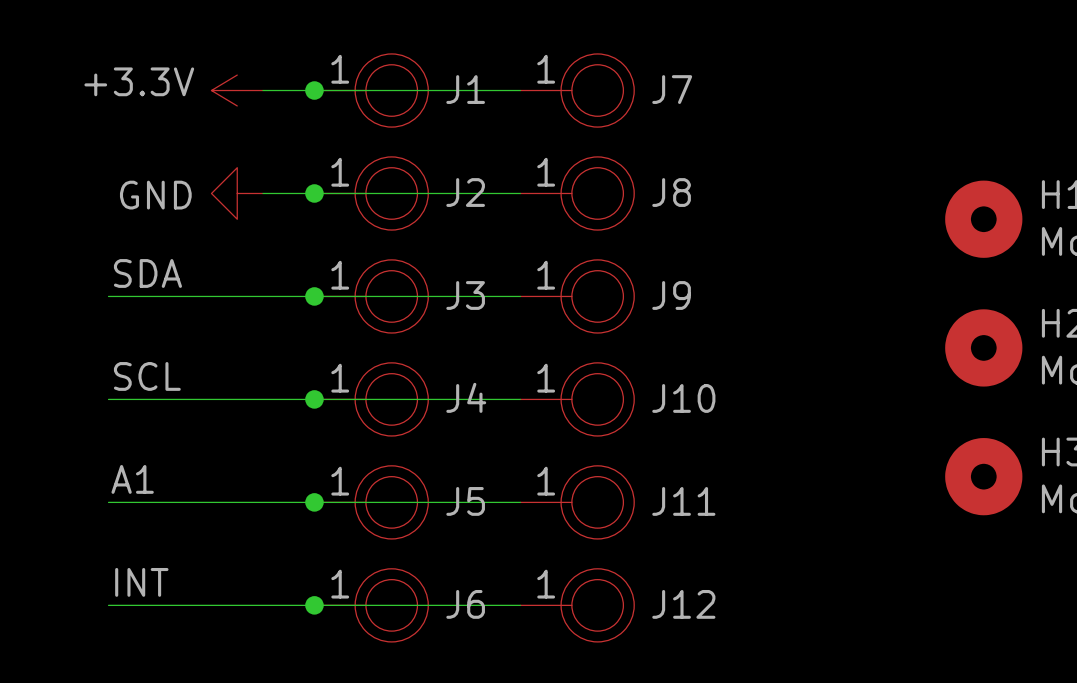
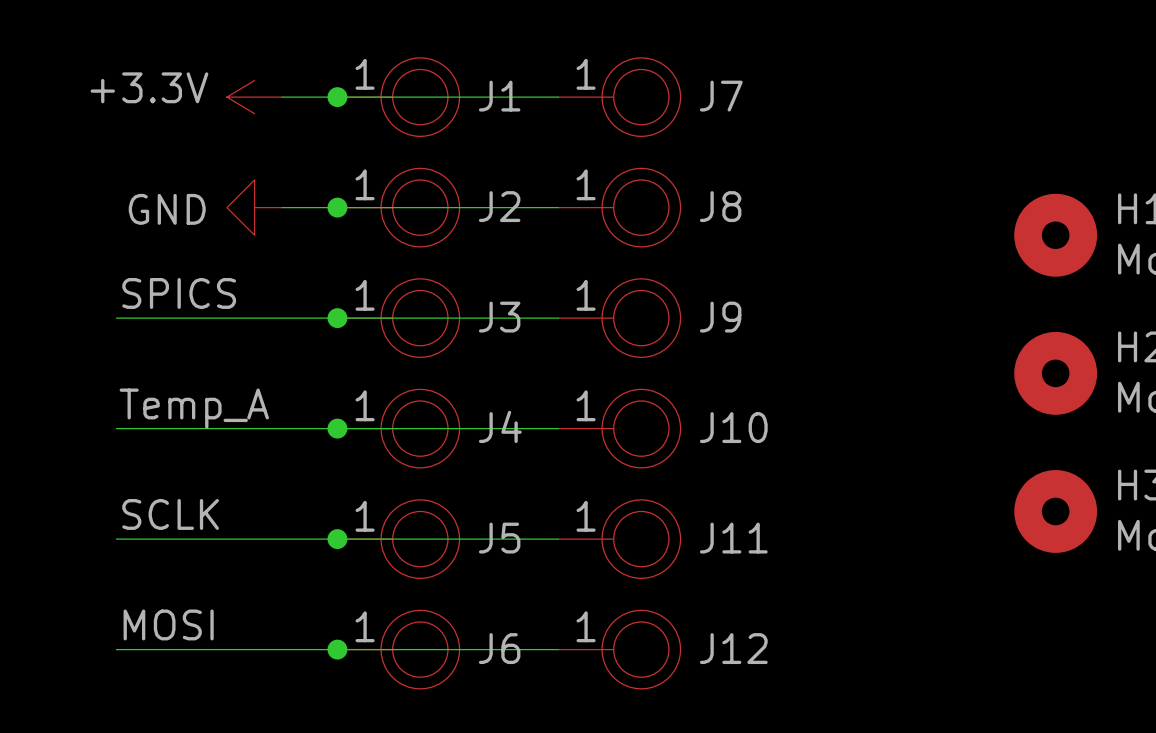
label: SDA (147, 273) -> SPICS (179, 293)
label: SCL (147, 376) -> Temp_A (194, 408)
label: A1 (132, 479) -> SCLK (170, 514)
label: INT (141, 582) -> MOSI (168, 624)

